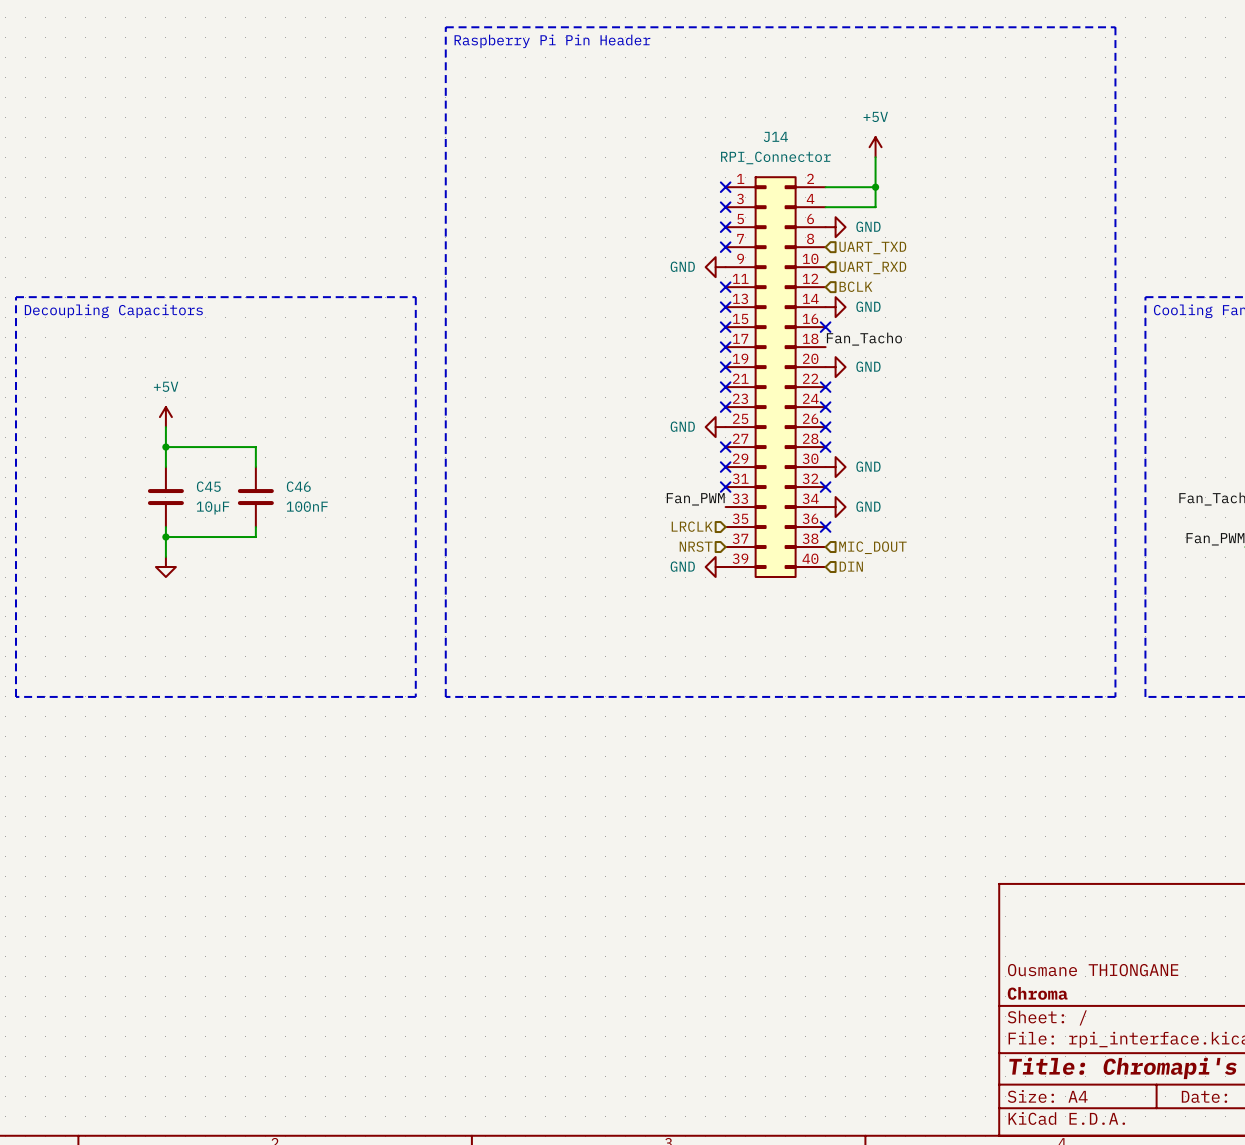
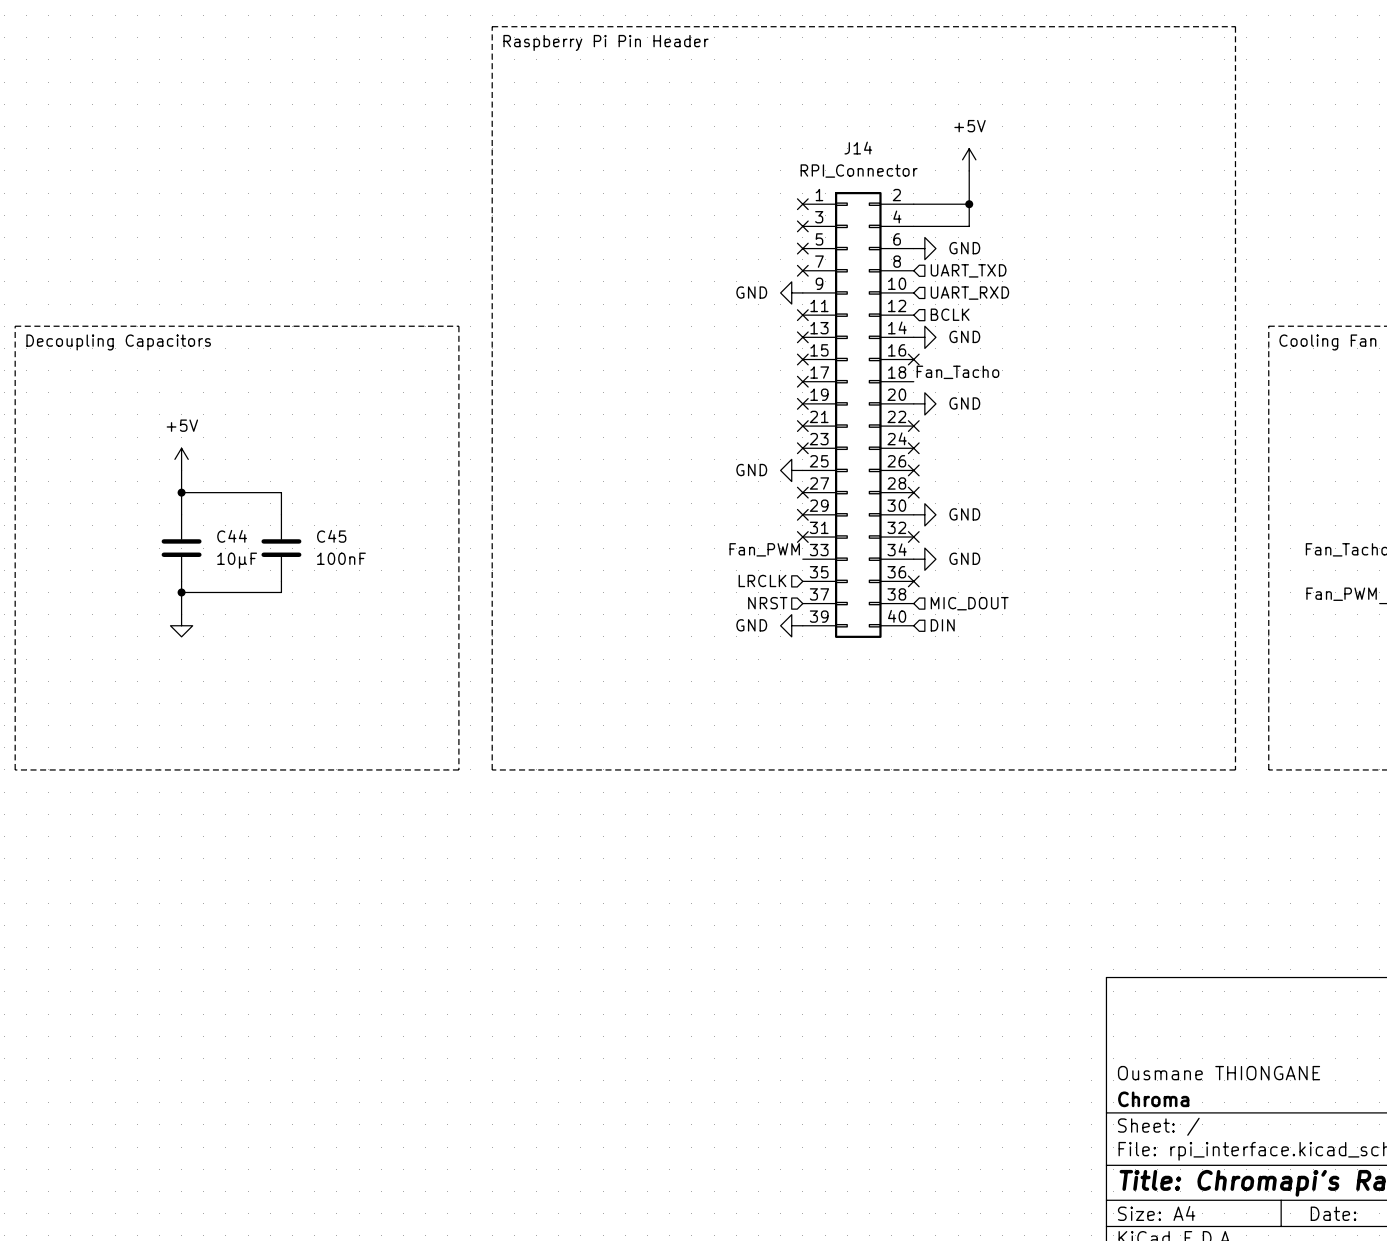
C45 name: C45 (208, 486) -> C44 (232, 536)
C46 name: C46 (298, 486) -> C45 (331, 536)

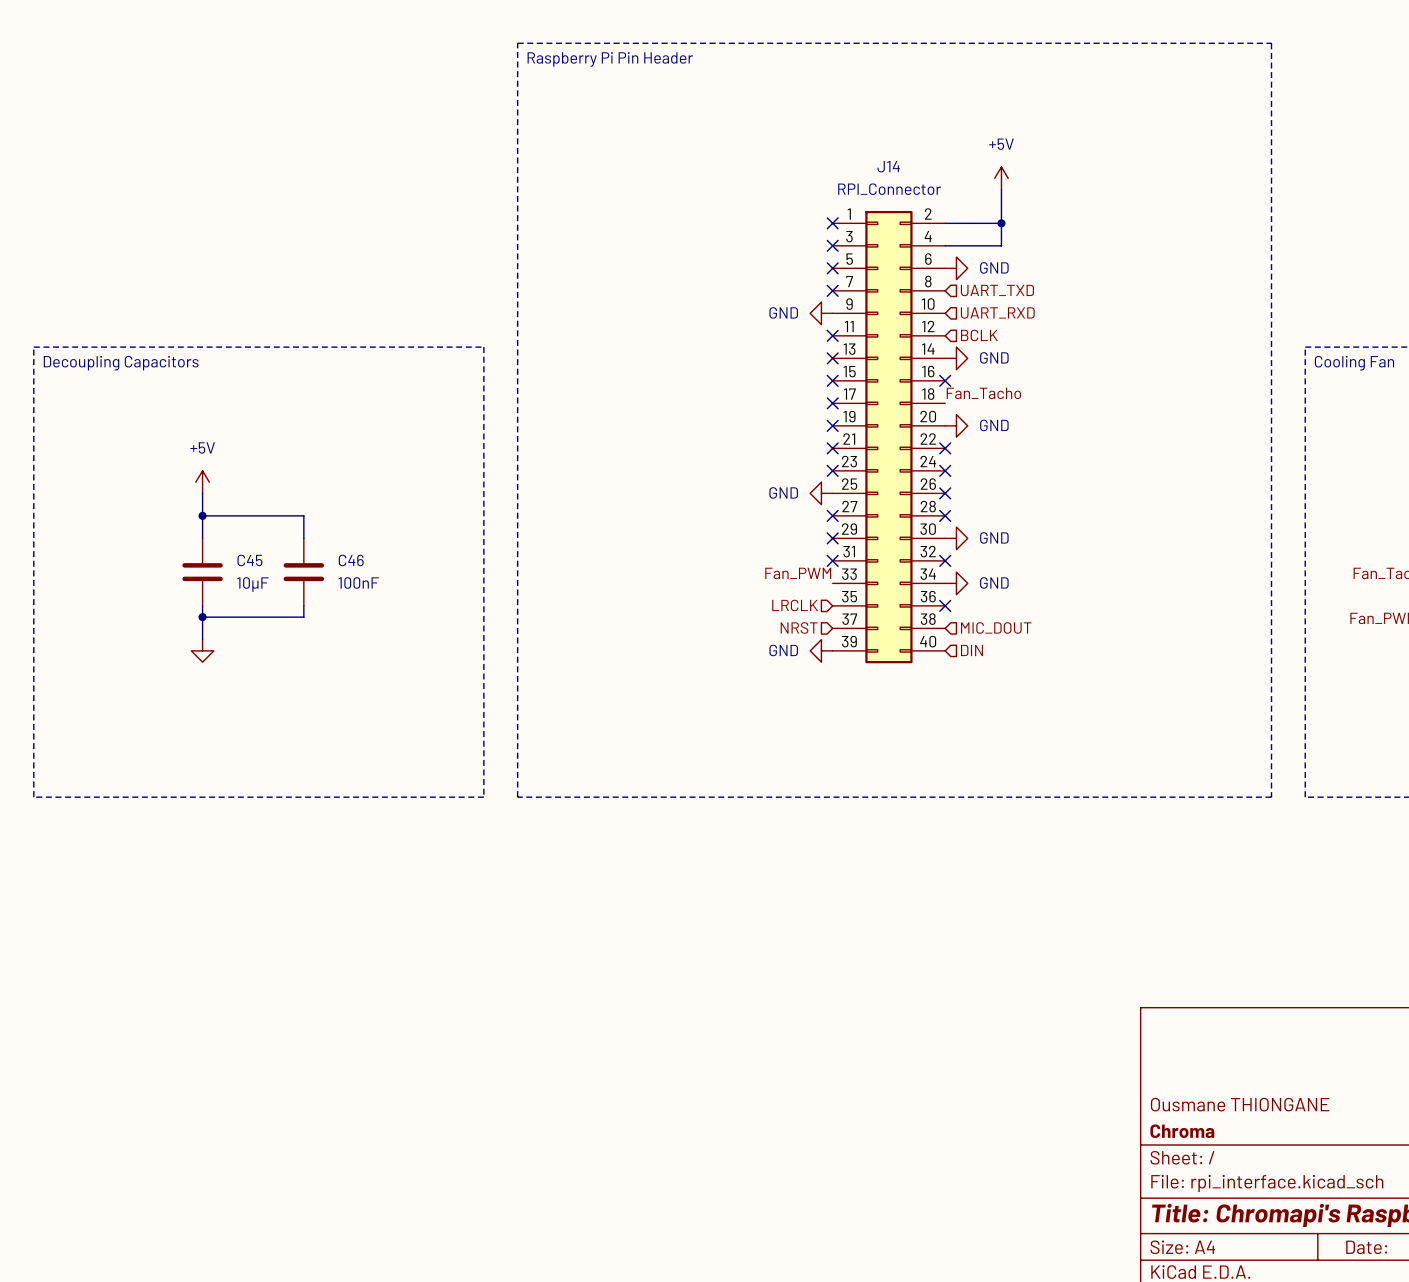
C44 name: C44 (232, 536) -> C45 (249, 560)
C45 name: C45 (331, 536) -> C46 (351, 560)

